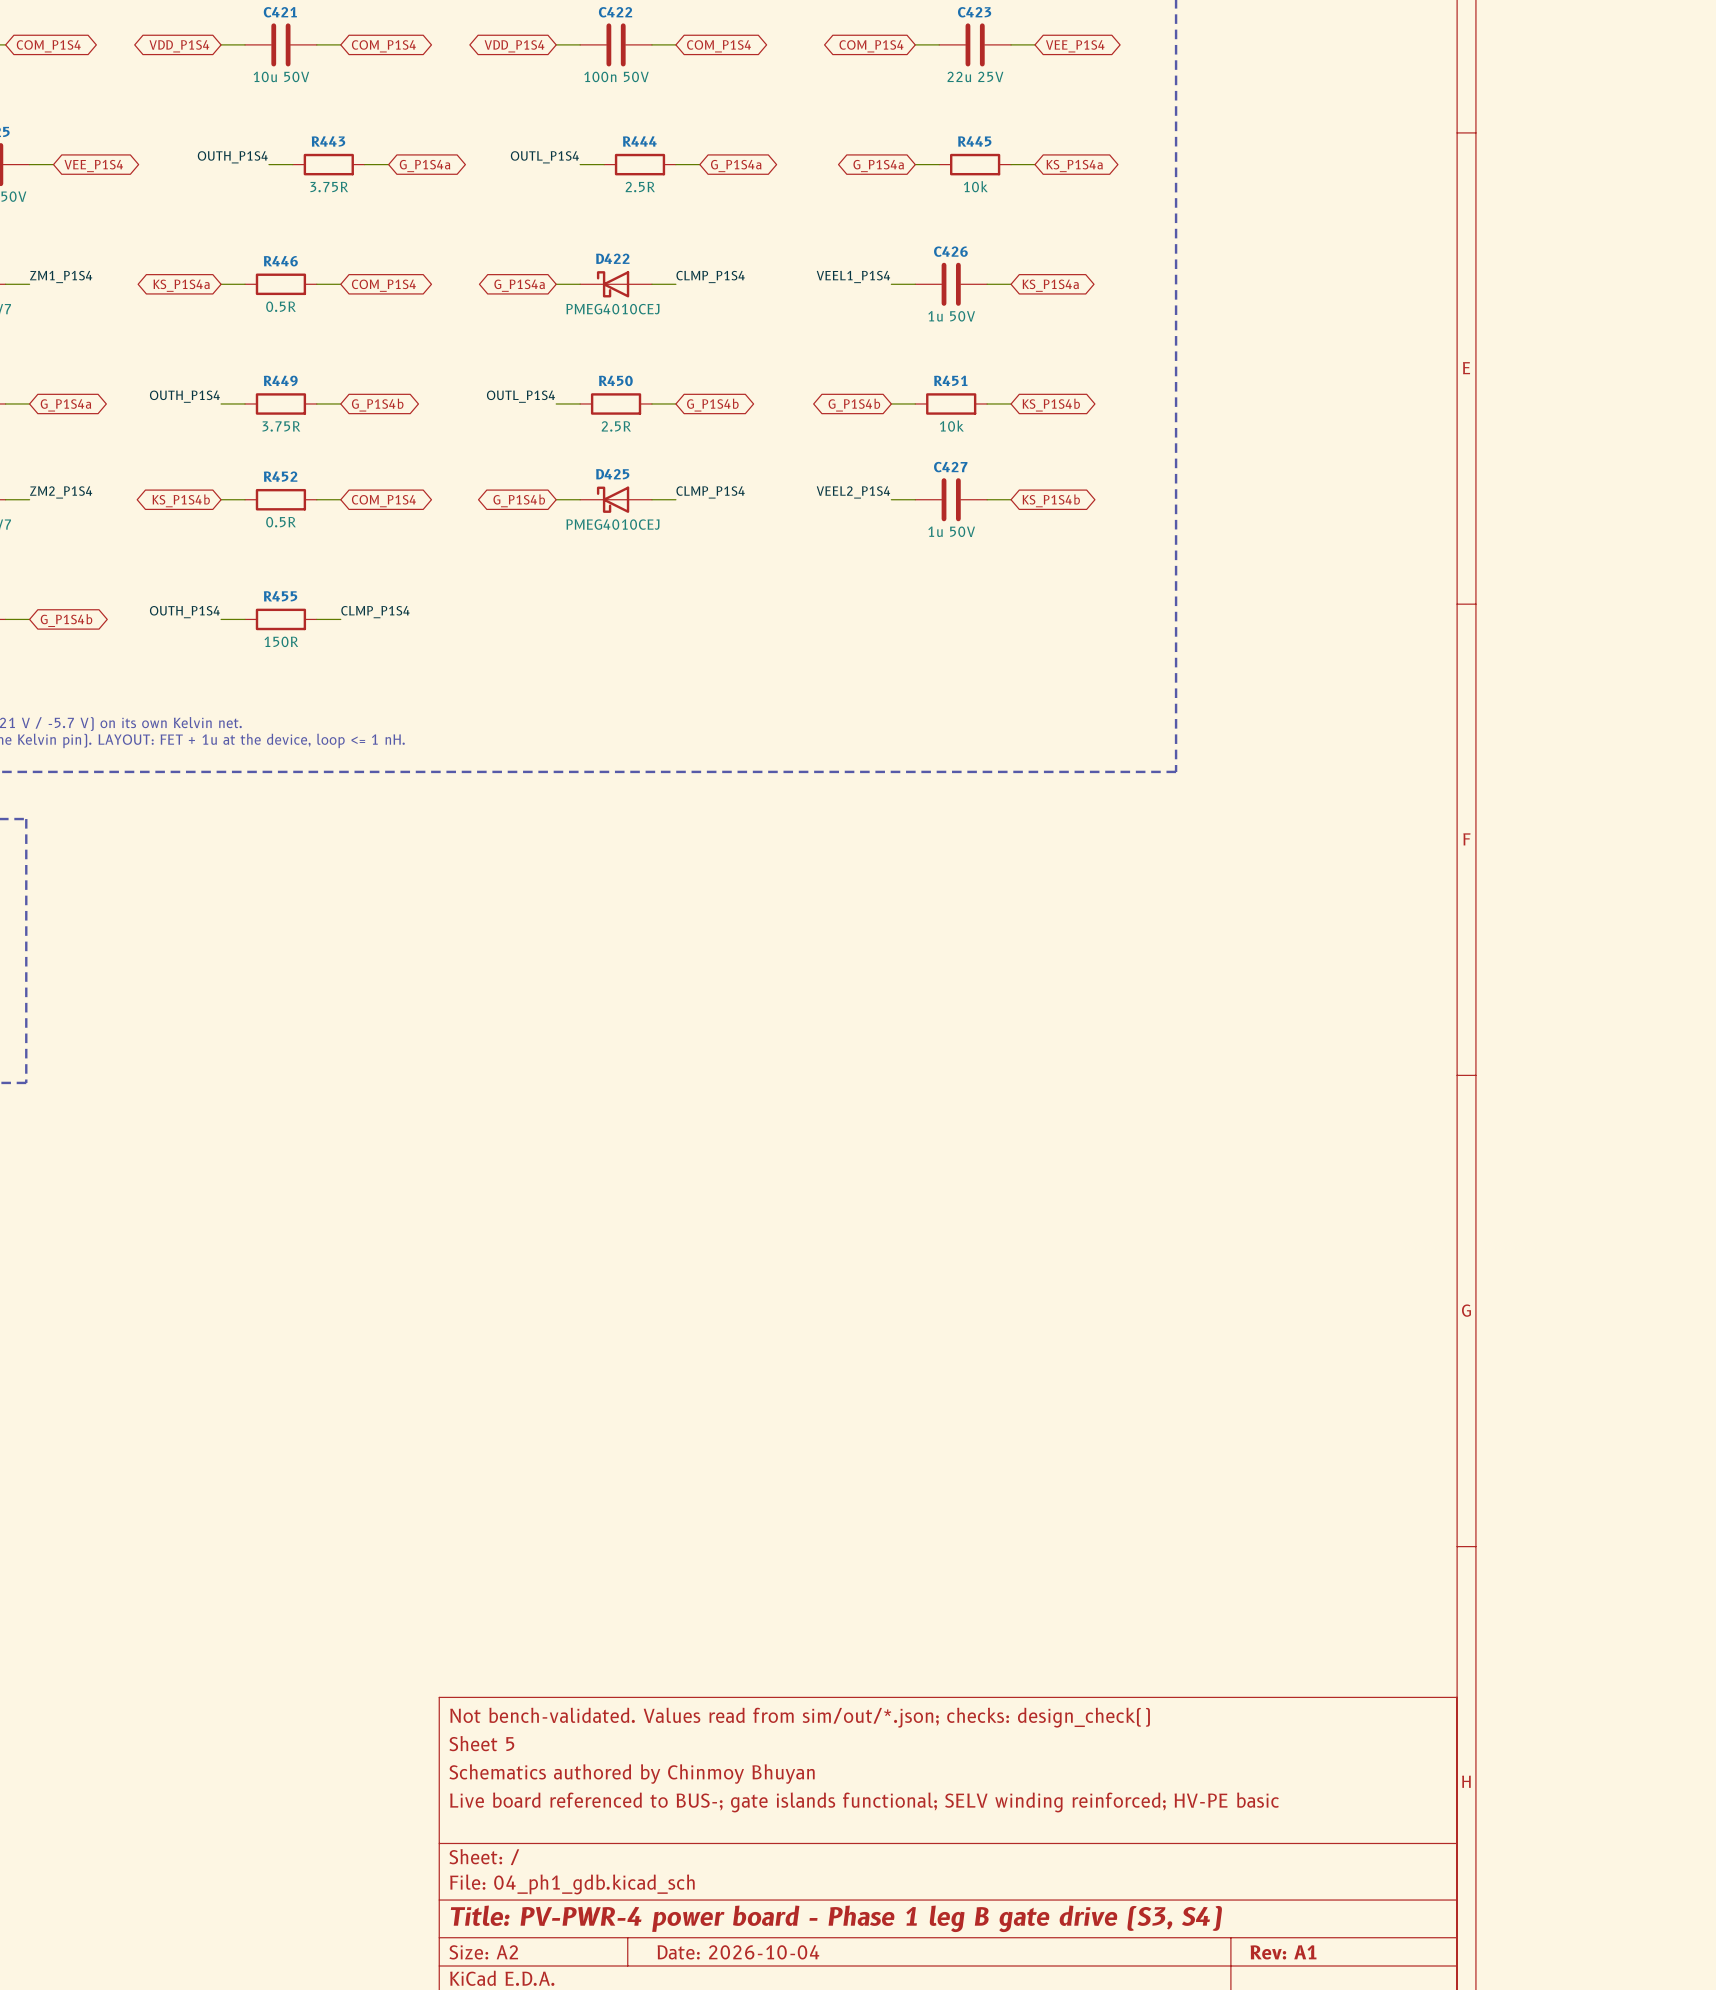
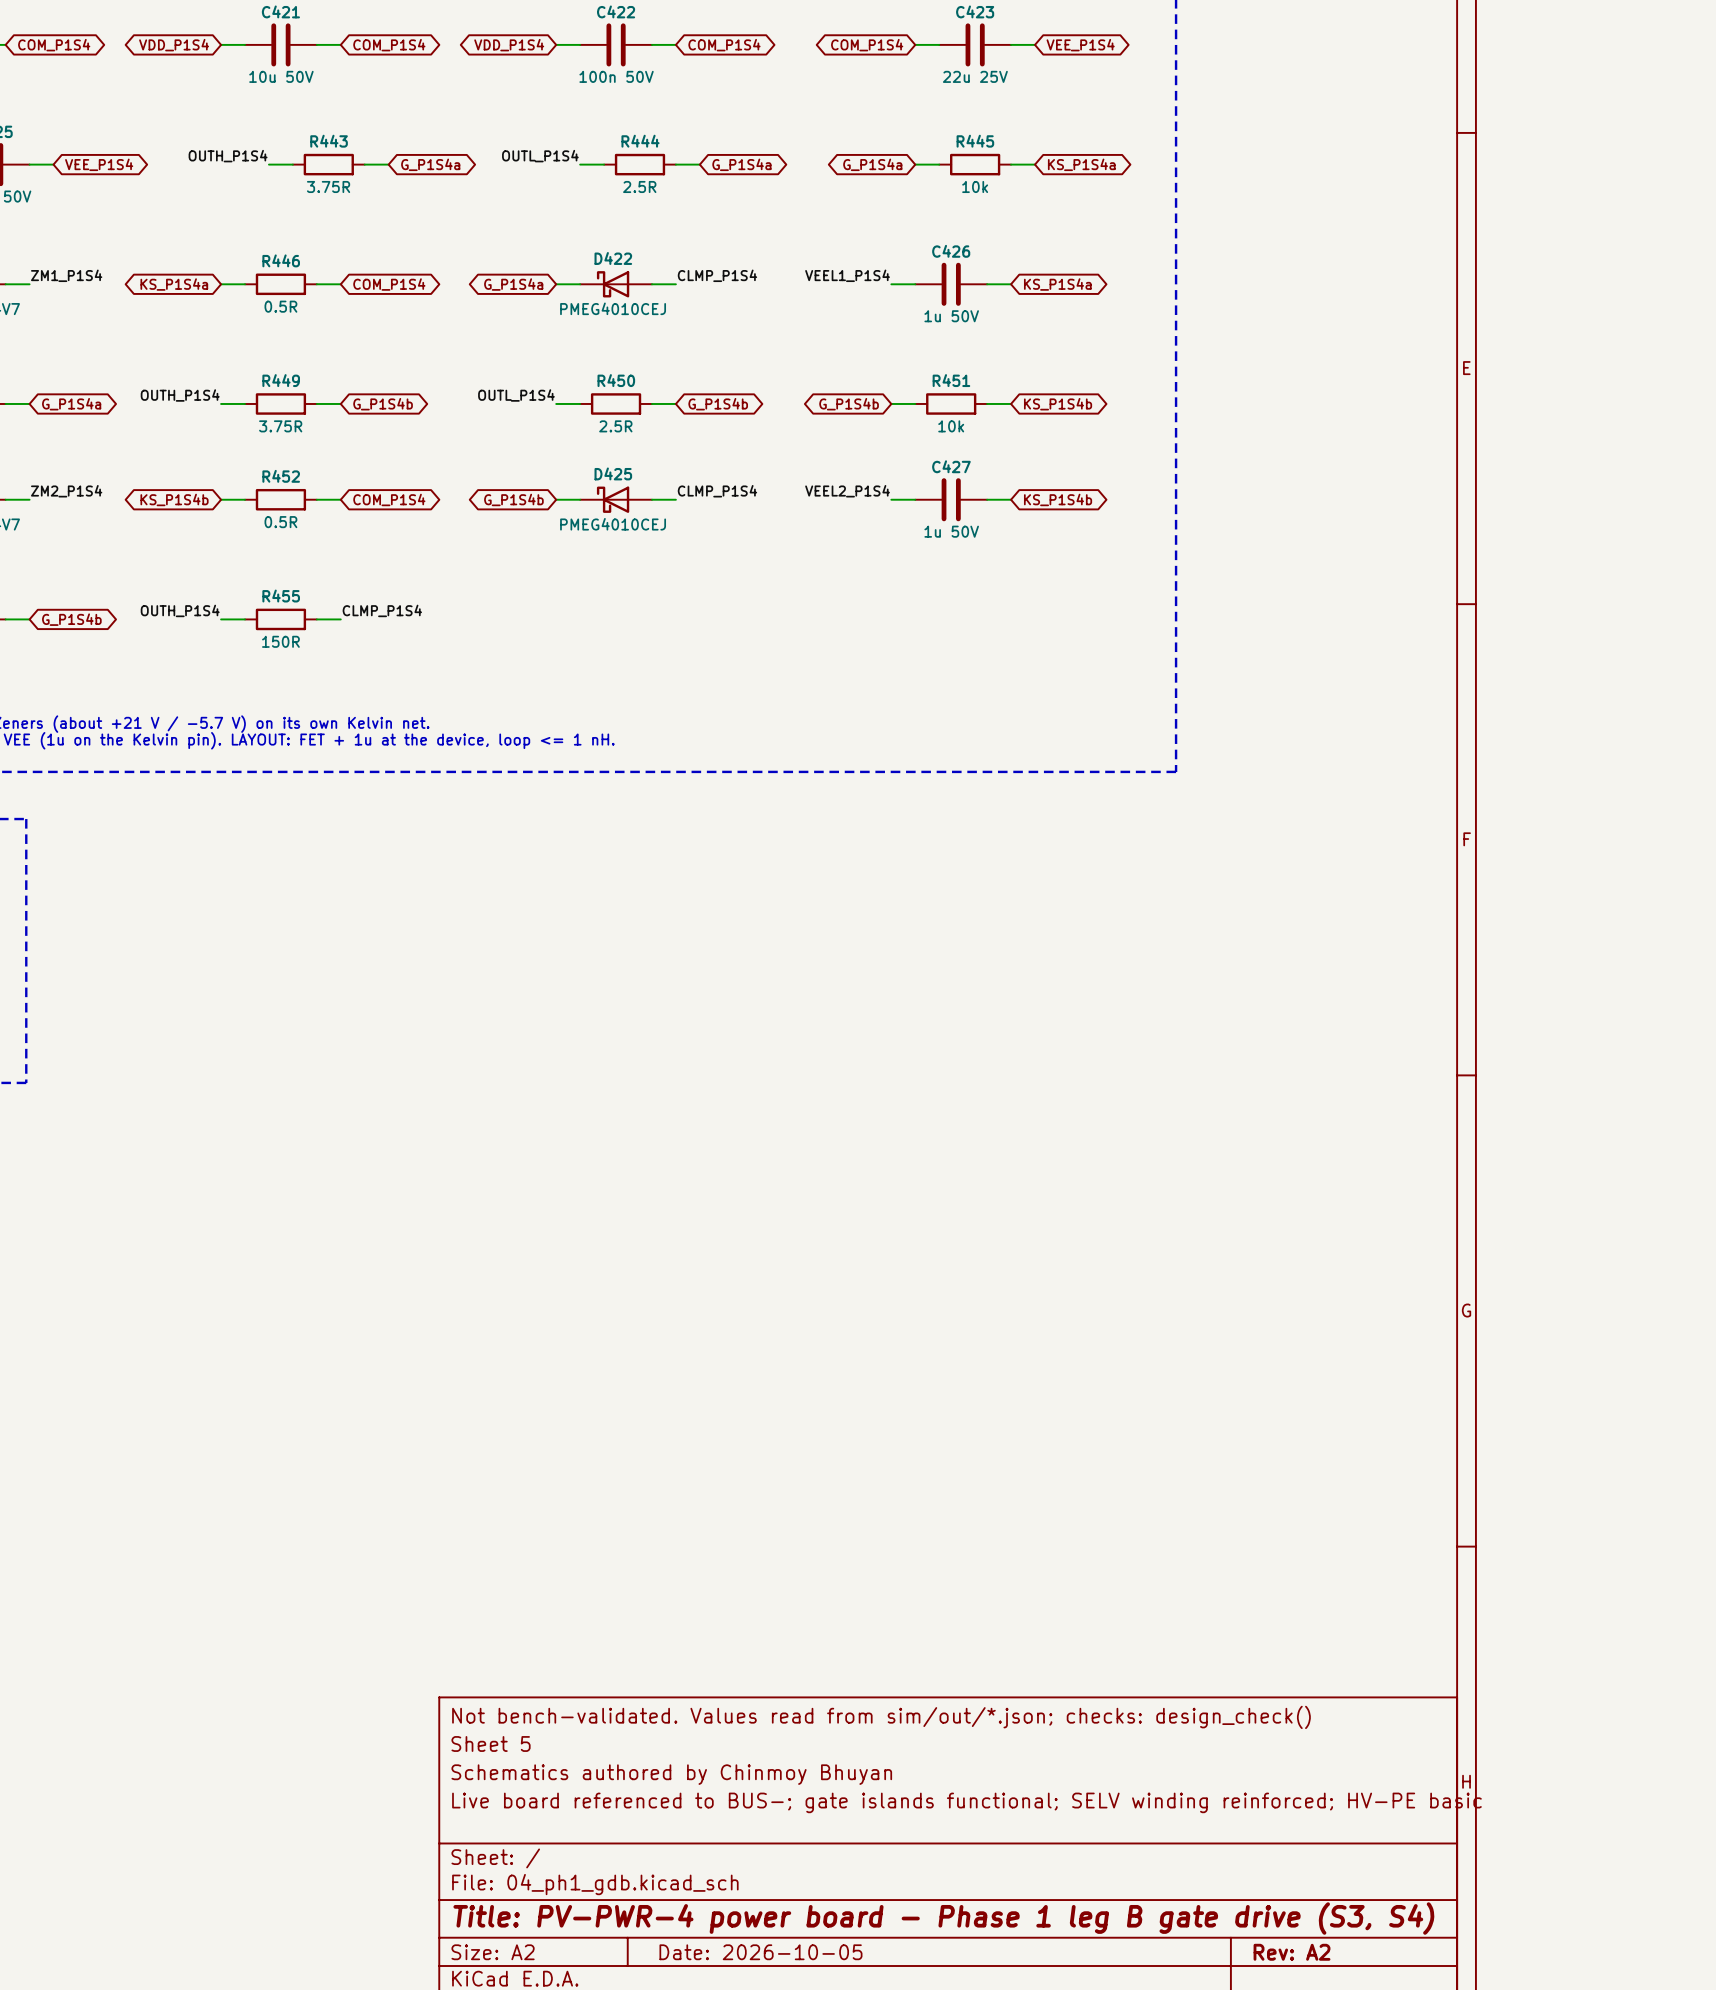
title block: Date: 2026-10-04 (738, 1952) -> Date: 2026-10-05 (760, 1952)
title block: Rev: A1 (1283, 1952) -> Rev: A2 (1292, 1952)

